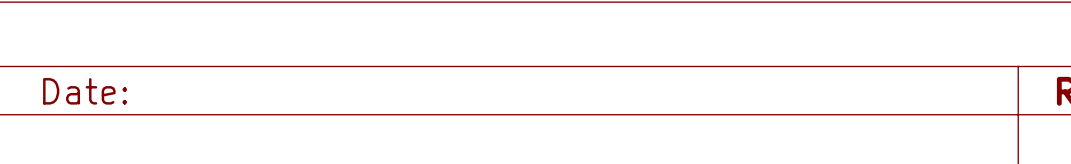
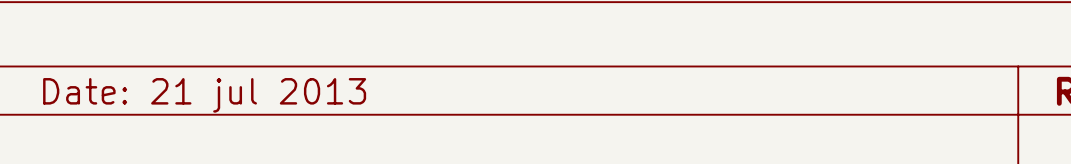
title block: Date: (85, 91) -> Date: 21 jul 2013 (204, 95)

